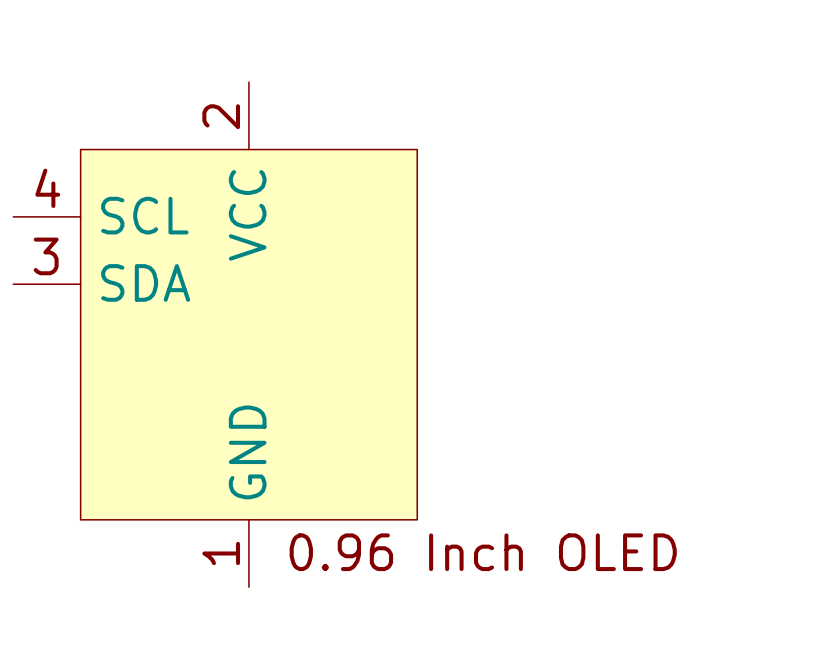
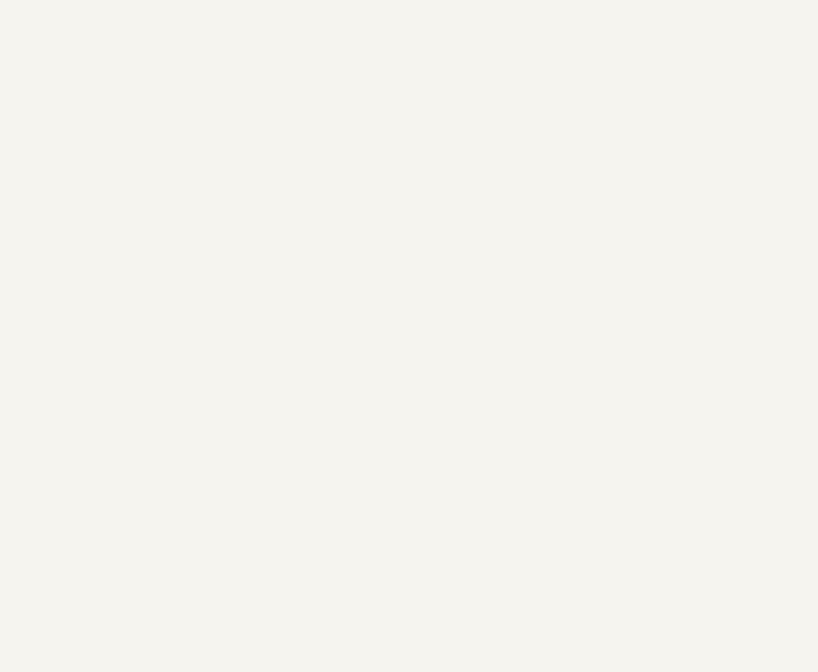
part: (215, 334) -> none

